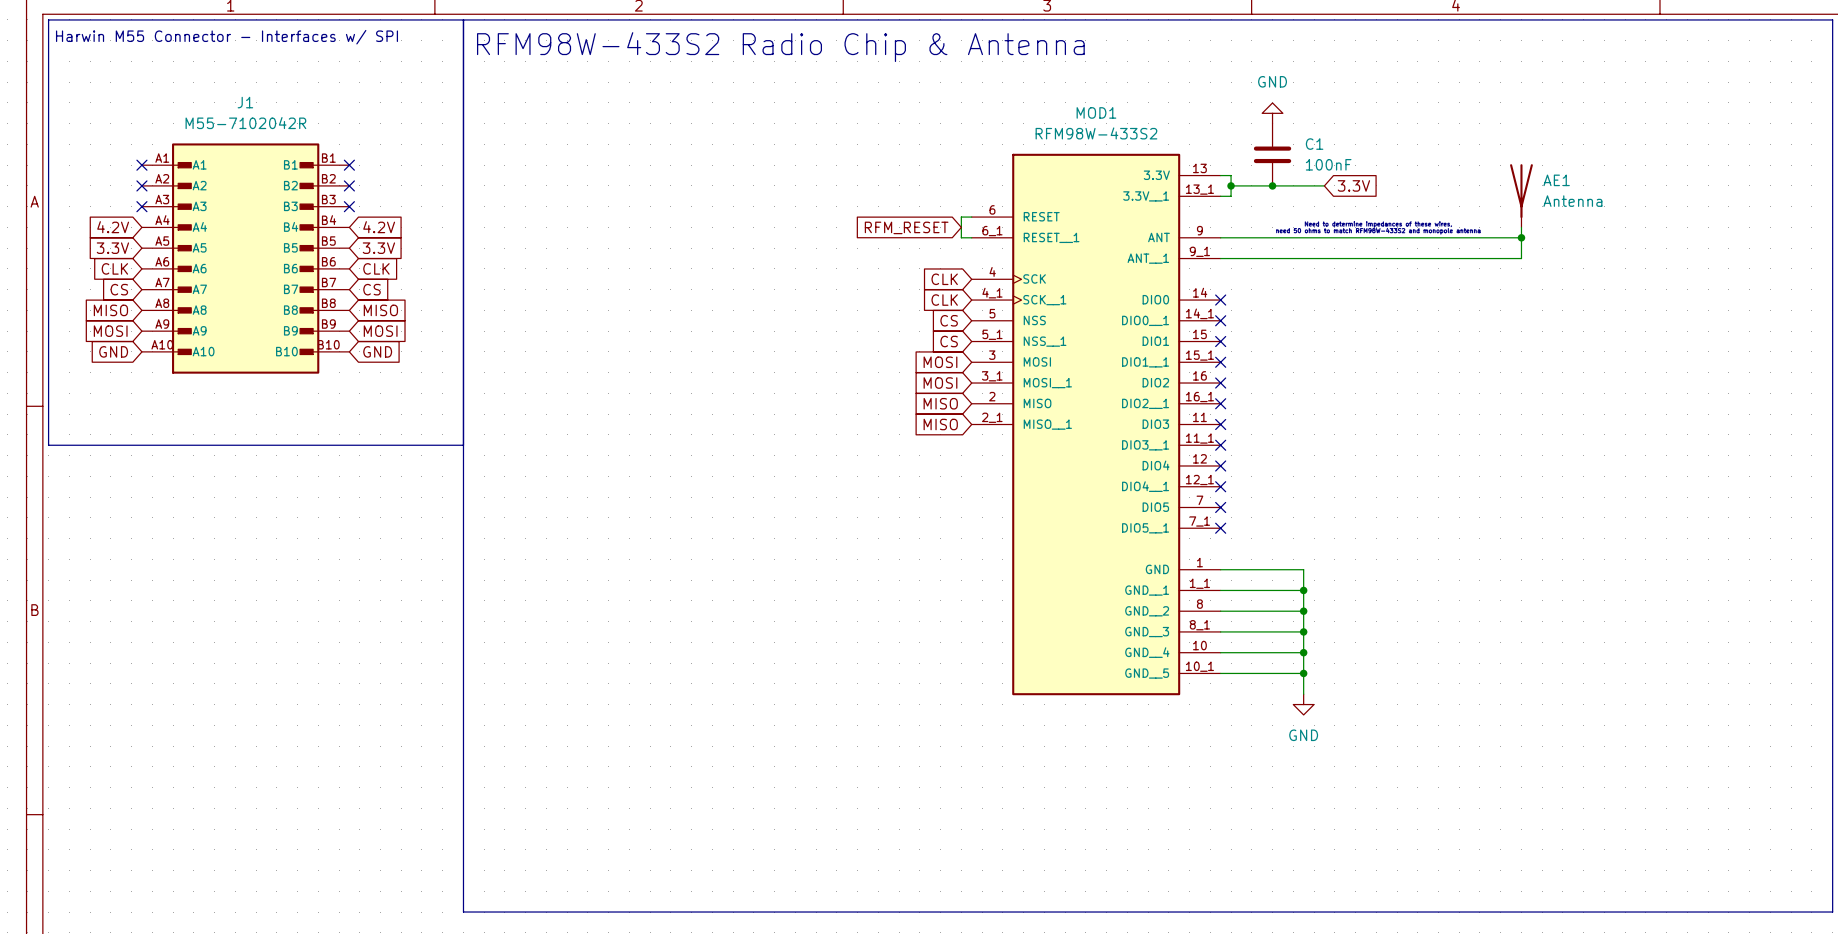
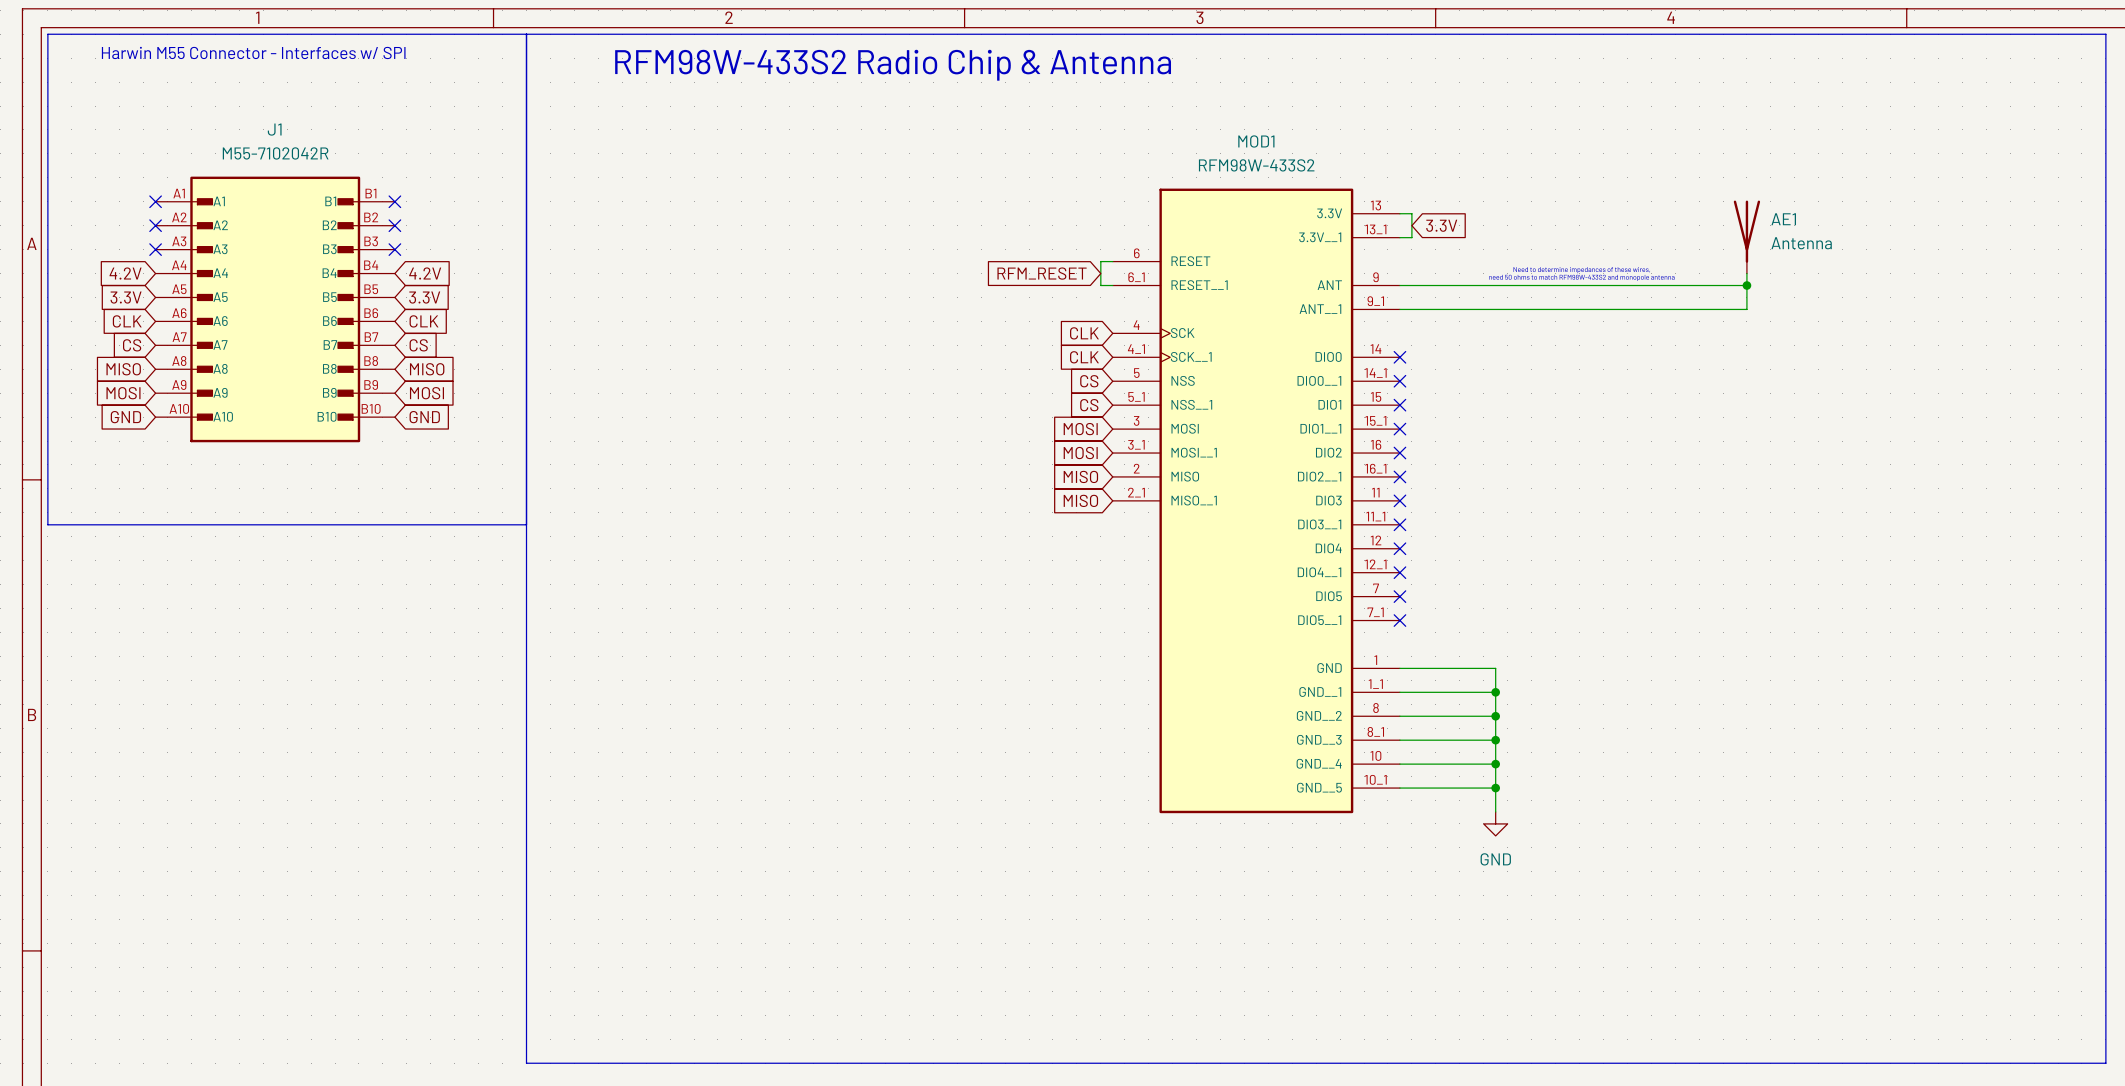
power symbol: GND (1272, 113) -> none
C1: 100nF (1272, 154) -> none
wire: (1231, 185) (1324, 185) -> none
junction: (1231, 185) -> none
junction: (1272, 185) -> none
global label position: 3.3V (1353, 185) -> 3.3V (1441, 225)

